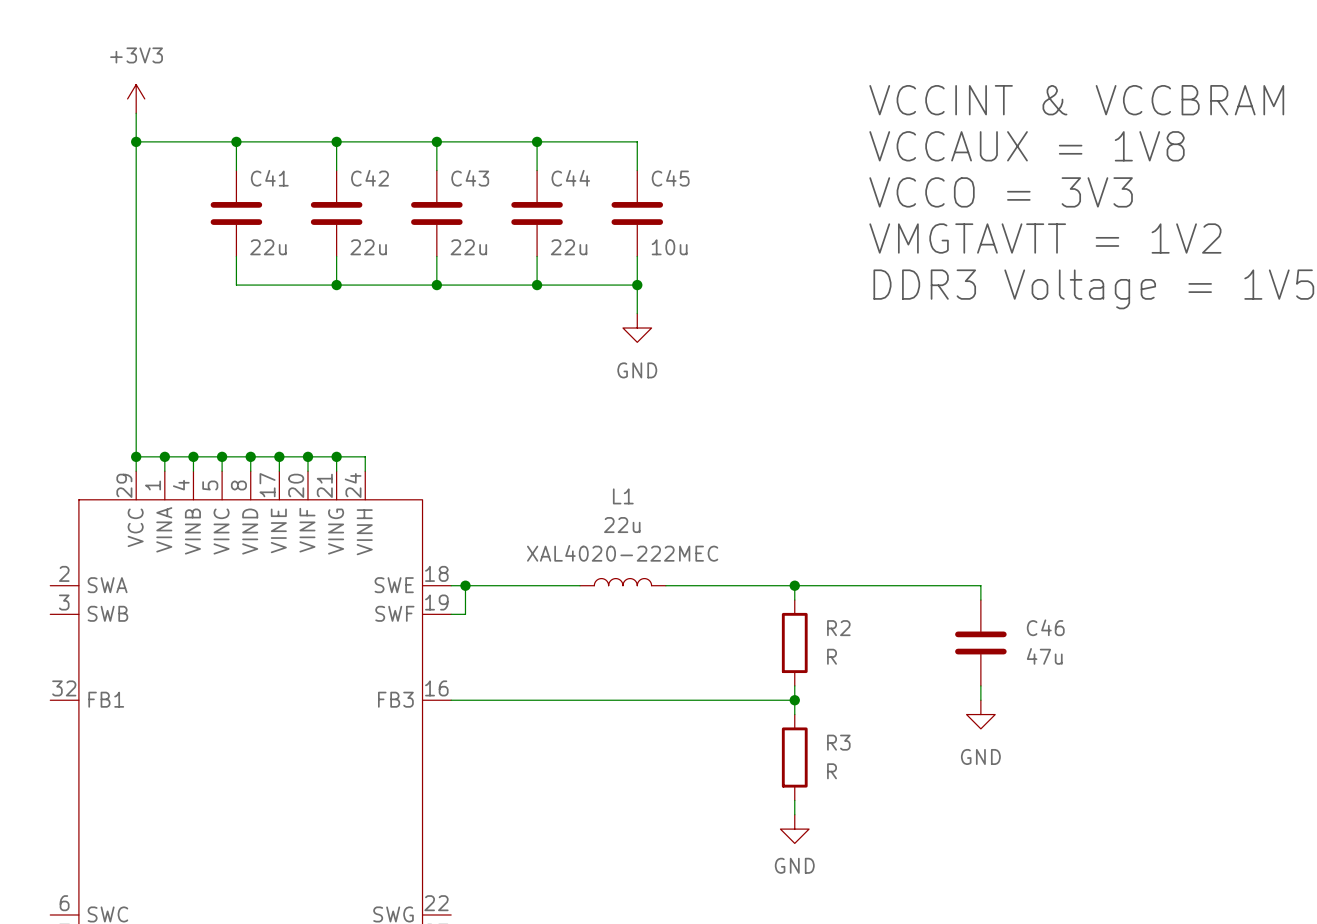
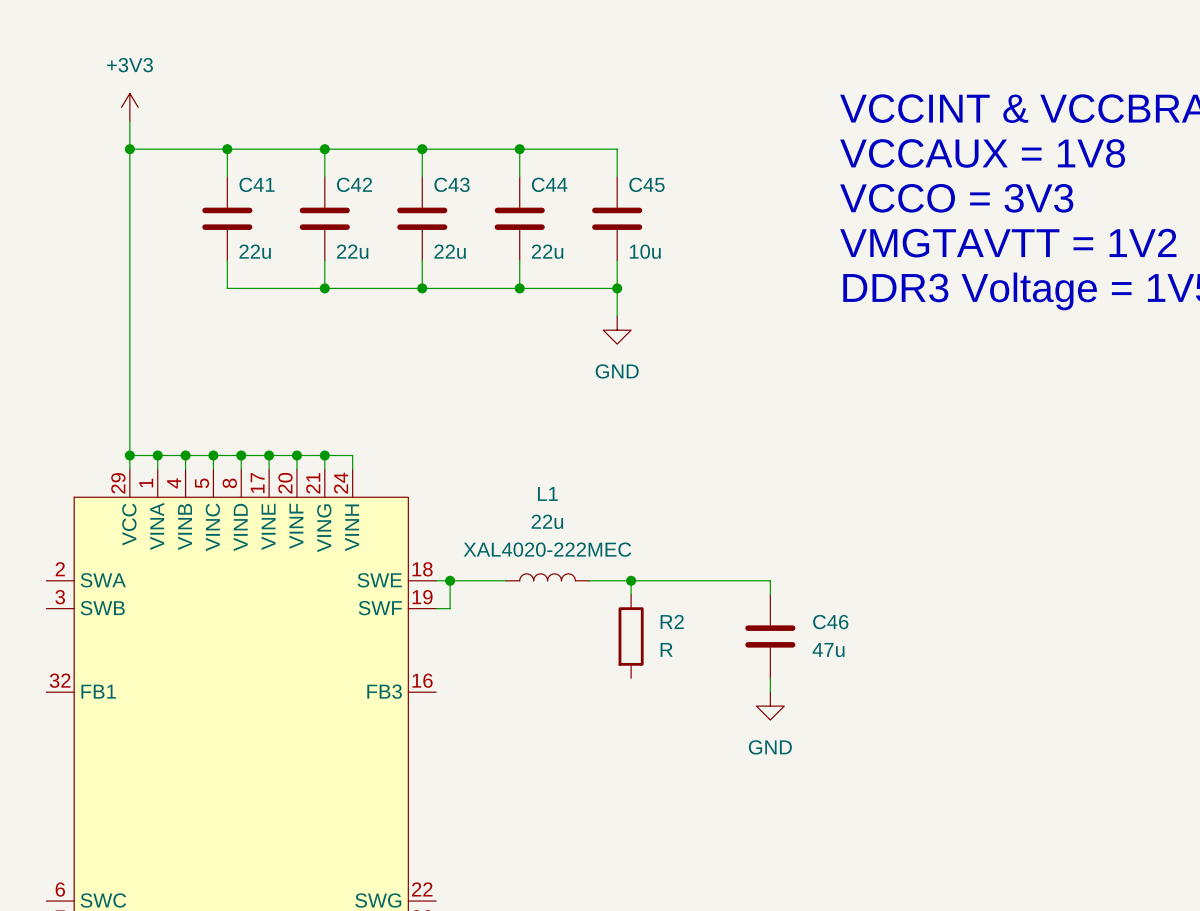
L1 position: (622, 582) -> (547, 577)
wire: (522, 585) (580, 585) -> (589, 580) (645, 580)
junction: none -> (631, 580)
wire: (794, 585) (980, 585) (980, 600) -> none
junction: (794, 585) -> none
R2 position: (794, 642) -> (631, 636)
C46 position: (980, 642) -> (770, 636)
wire: (980, 685) (980, 700) -> none
wire: (451, 700) (794, 700) (794, 714) -> none
junction: (794, 700) -> none
power symbol: none -> GND (770, 706)
power symbol: GND (980, 714) -> none
R3: R (794, 757) -> none
wire: (794, 800) (794, 814) -> (631, 580) (631, 594)
power symbol: GND (794, 829) -> none

